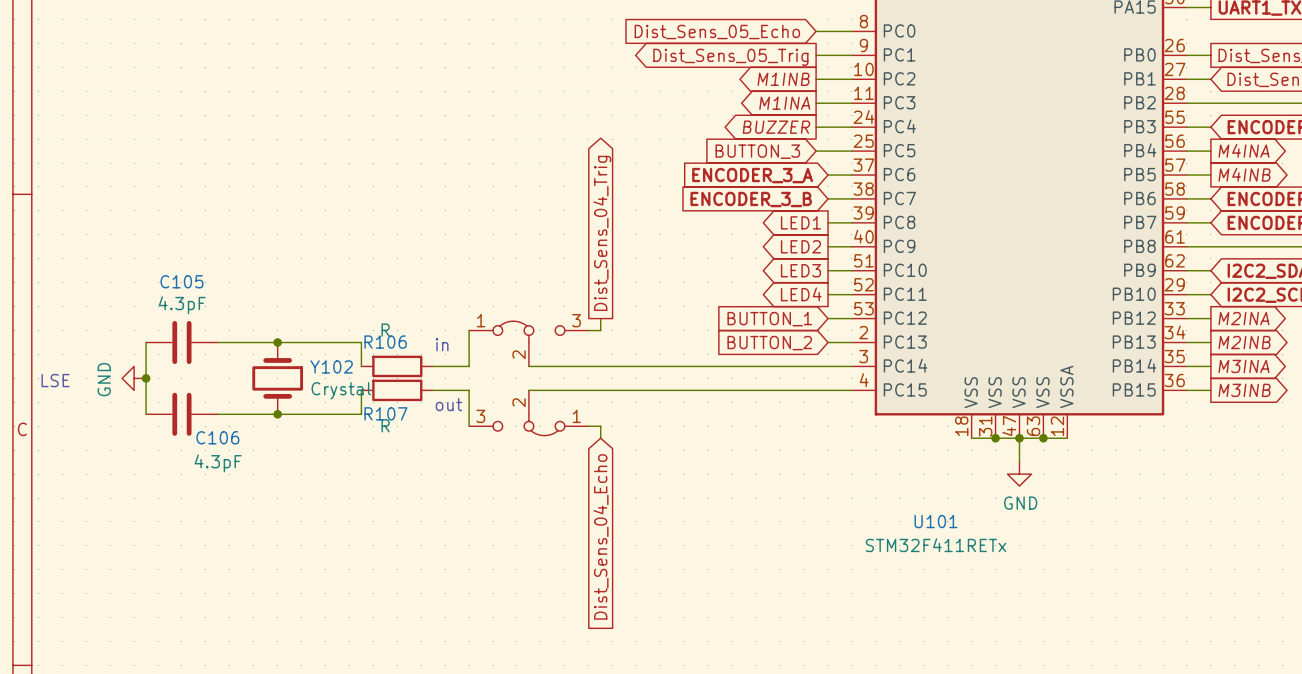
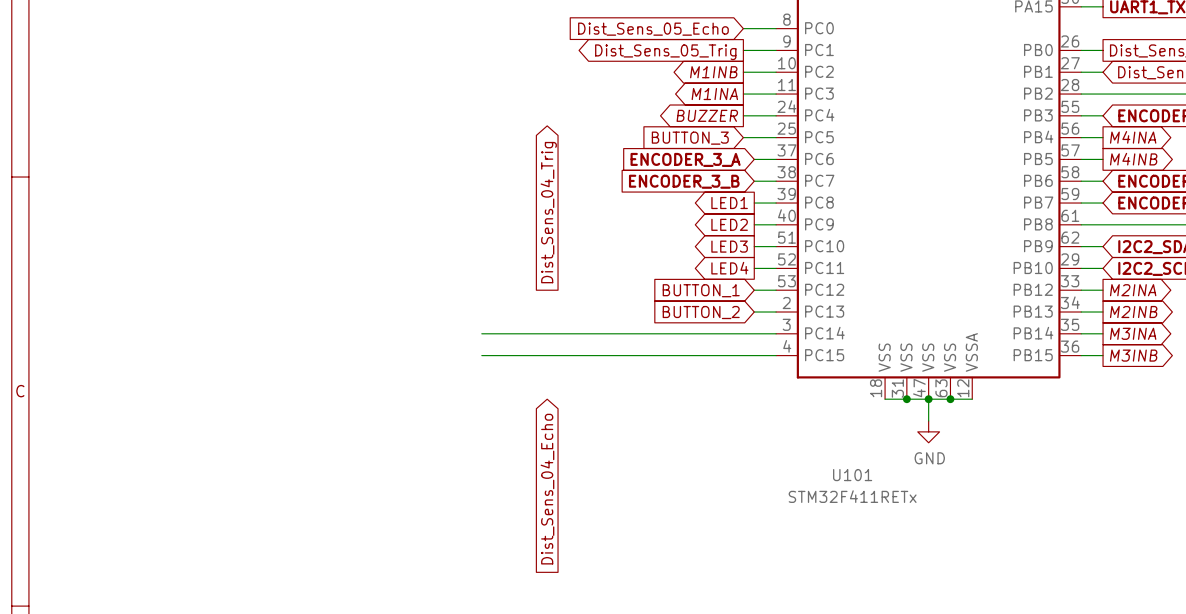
wire: (600, 318) (600, 330) (588, 330) -> none
wire: (469, 330) (469, 366) (433, 366) -> none
wire: (146, 342) (146, 414) -> none
C105: 4.3pF (181, 342) -> none
wire: (217, 342) (361, 342) (361, 366) -> none
junction: (277, 342) -> none
part: (528, 343) -> none
text: in (442, 344) -> none
R106: R (397, 366) -> none
power symbol: GND (134, 378) -> none
junction: (146, 378) -> none
Y102: Crystal (277, 378) -> none
text: LSE (55, 380) -> none
wire: (361, 390) (361, 414) (217, 414) -> none
R107: R (397, 390) -> none
wire: (433, 390) (469, 390) (469, 426) -> none
text: out (448, 404) -> none
part: (528, 412) -> none
C106: 4.3pF (181, 414) -> none
junction: (277, 414) -> none
wire: (588, 426) (600, 426) (600, 438) -> none

